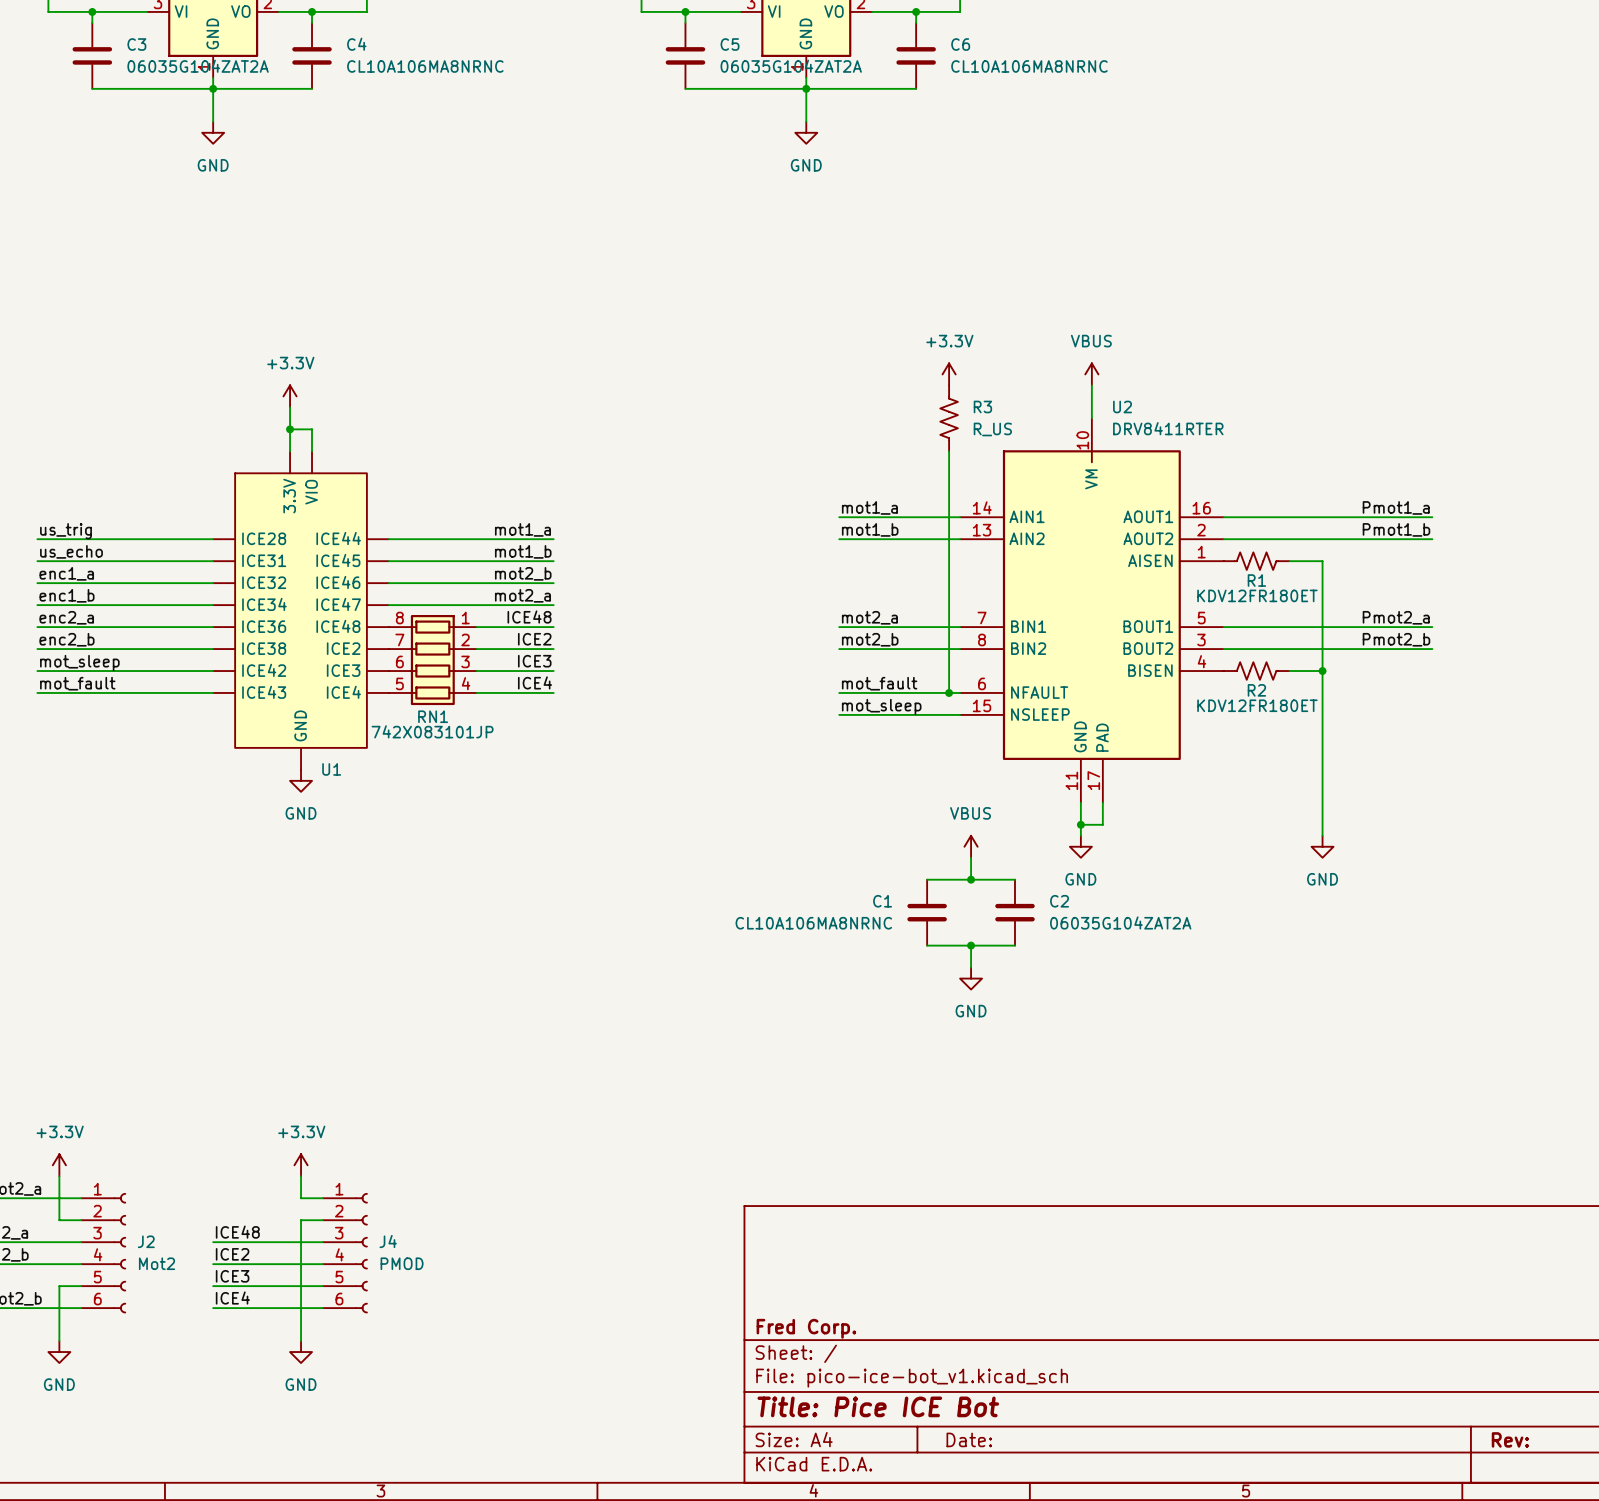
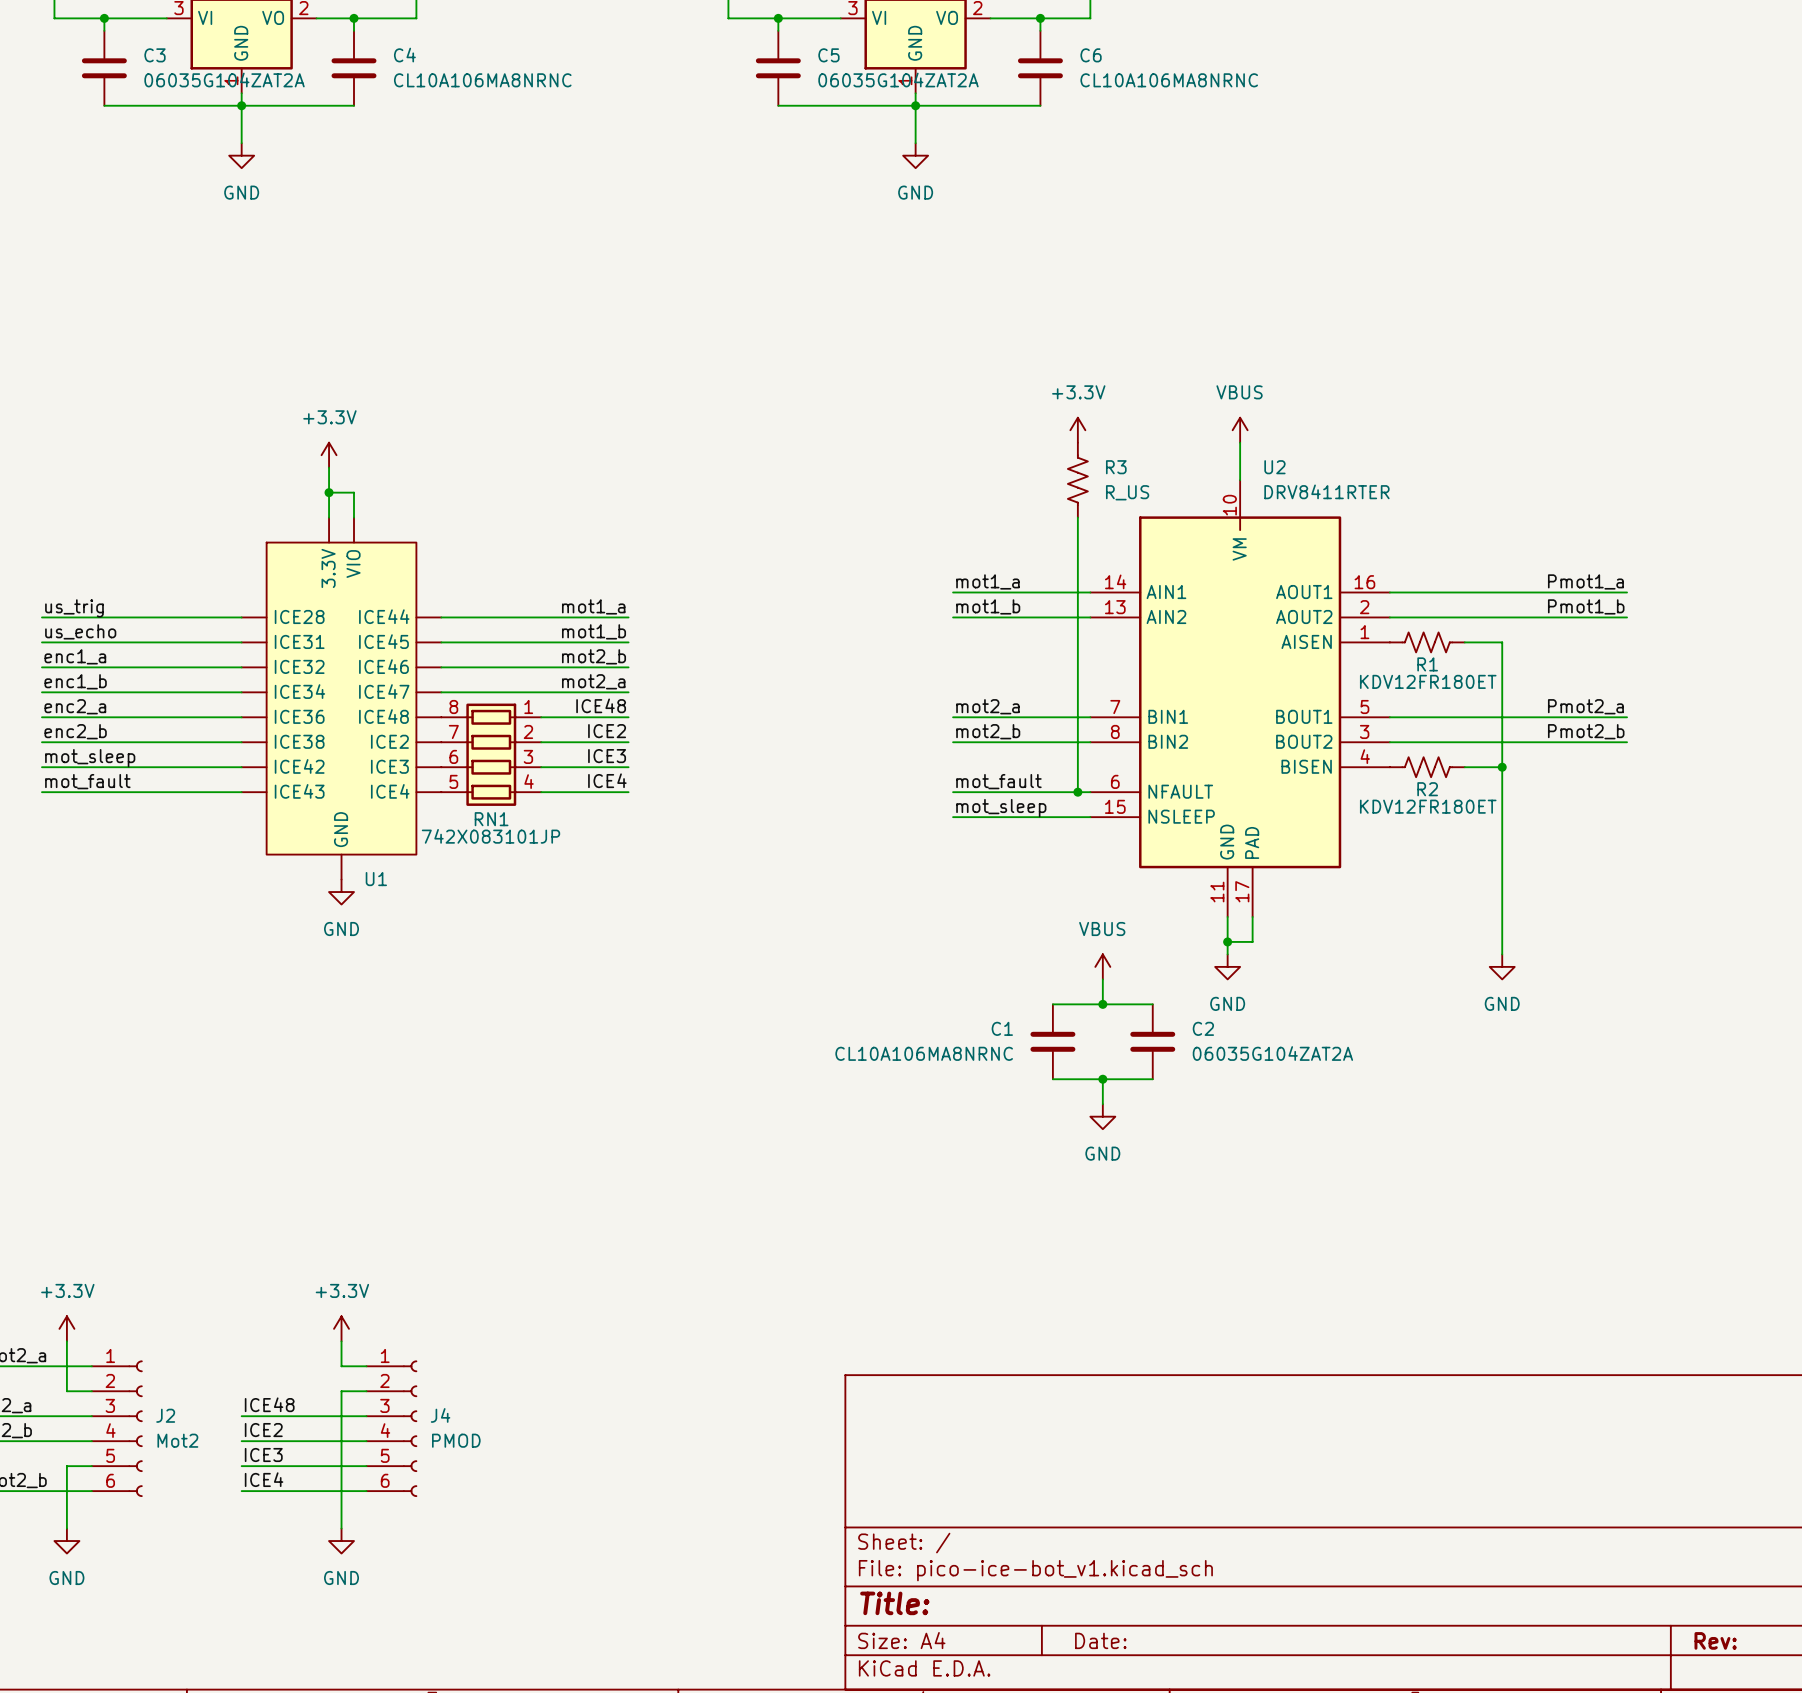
title block: Fred Corp. (806, 1328) -> none
title block: Title: Pice ICE Bot (878, 1406) -> Title: (894, 1603)

